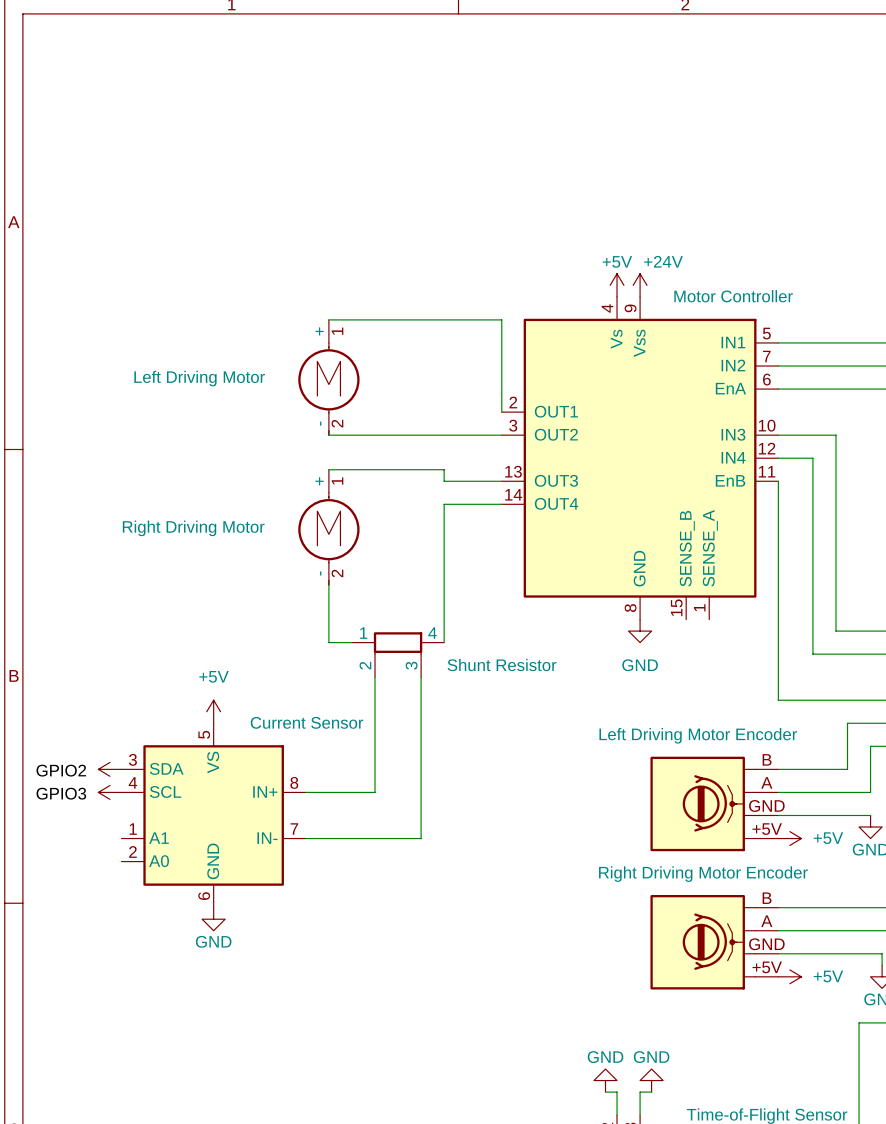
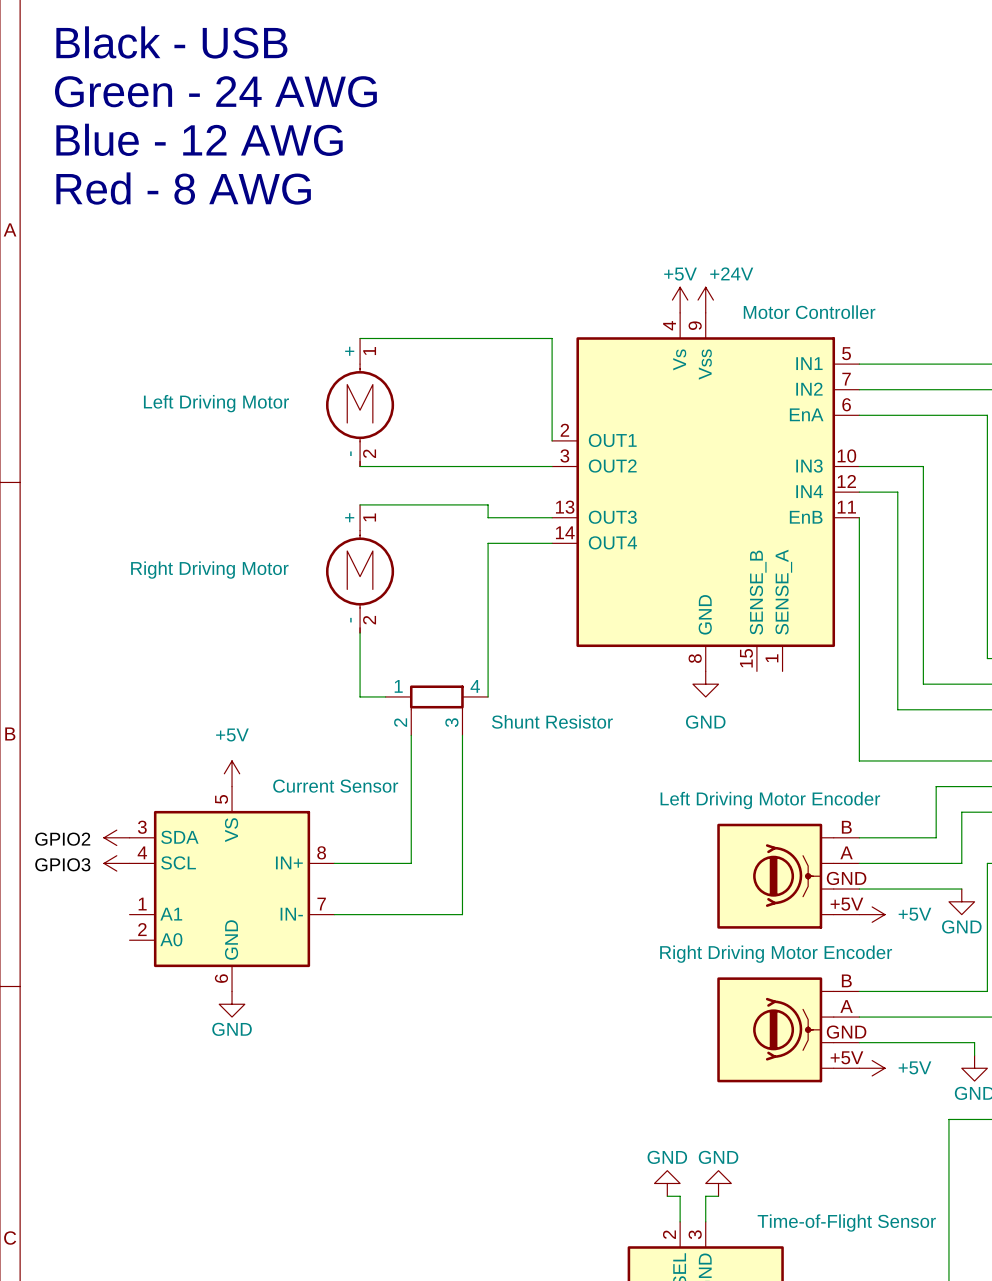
text: none -> Black - USB (171, 42)
text: none -> Green - 24 AWG (215, 91)
text: none -> Blue - 12 AWG (199, 139)
text: none -> Red - 8 AWG (183, 188)

